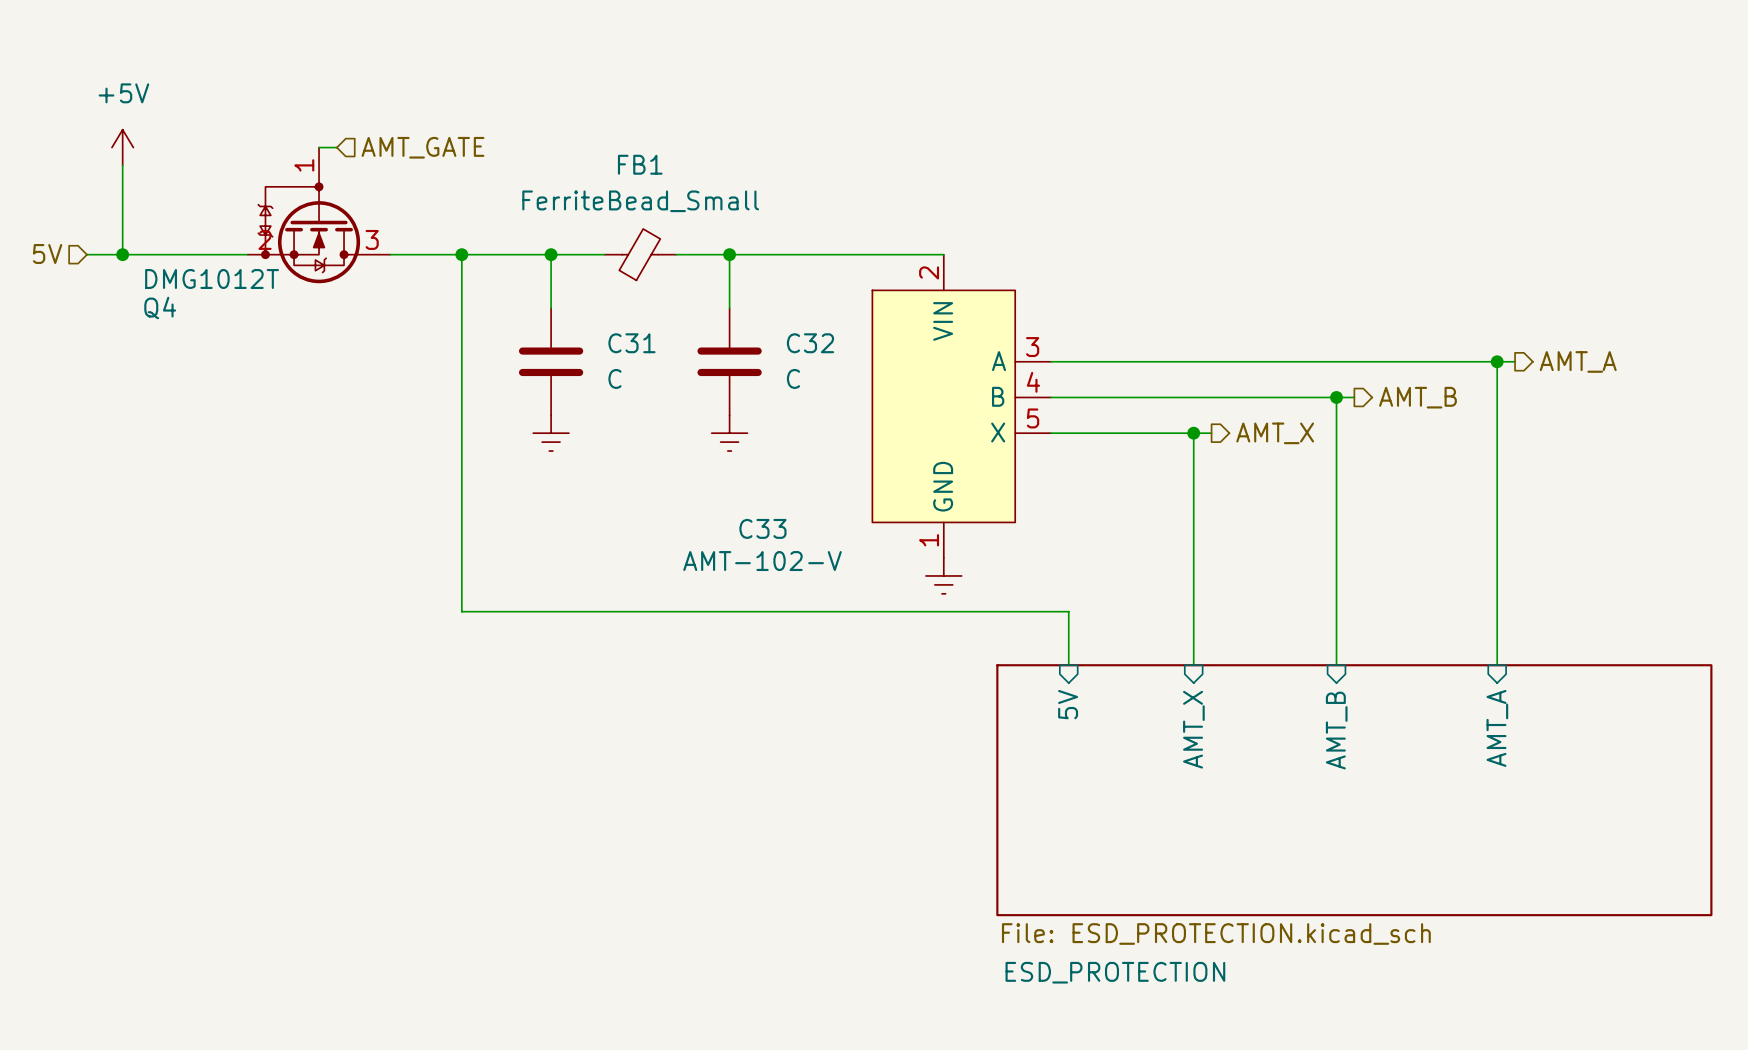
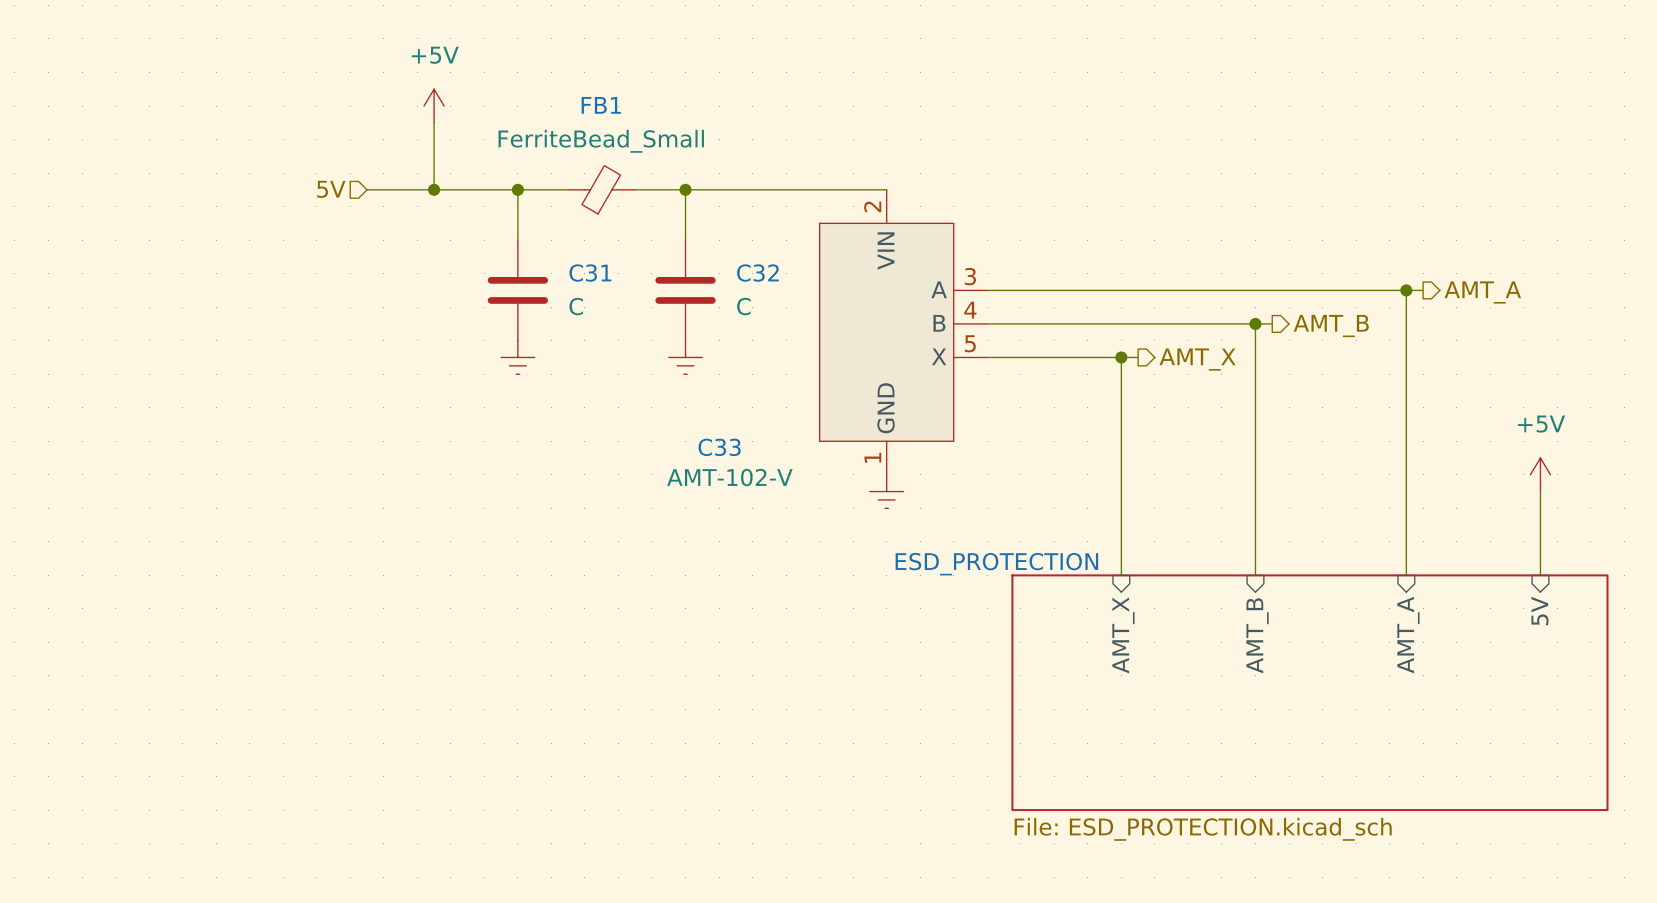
power symbol position: +5V (122, 147) -> +5V (434, 106)
wire: (319, 147) (336, 147) -> none
hierarchical label: AMT_GATE (423, 147) -> none
wire: (122, 165) (122, 254) -> none
Q4: DMG1012T (319, 215) -> none
hierarchical label position: 5V (47, 254) -> 5V (331, 189)
wire: (86, 254) (247, 254) -> none
junction: (122, 254) -> none
wire: (461, 254) (461, 611) (1068, 611) (1068, 665) -> (434, 189) (434, 122)
power symbol: none -> +5V (1540, 474)
wire: none -> (1540, 491) (1540, 575)
sheet pin: 5V (1068, 704) -> none
sheet pin: none -> 5V (1539, 611)
sheet ESD_PROTECTION: File: ESD_PROTECTION.kicad_sch (1354, 790) -> none
sheet ESD_PROTECTION: none -> File: ESD_PROTECTION.kicad_sch (1309, 692)

